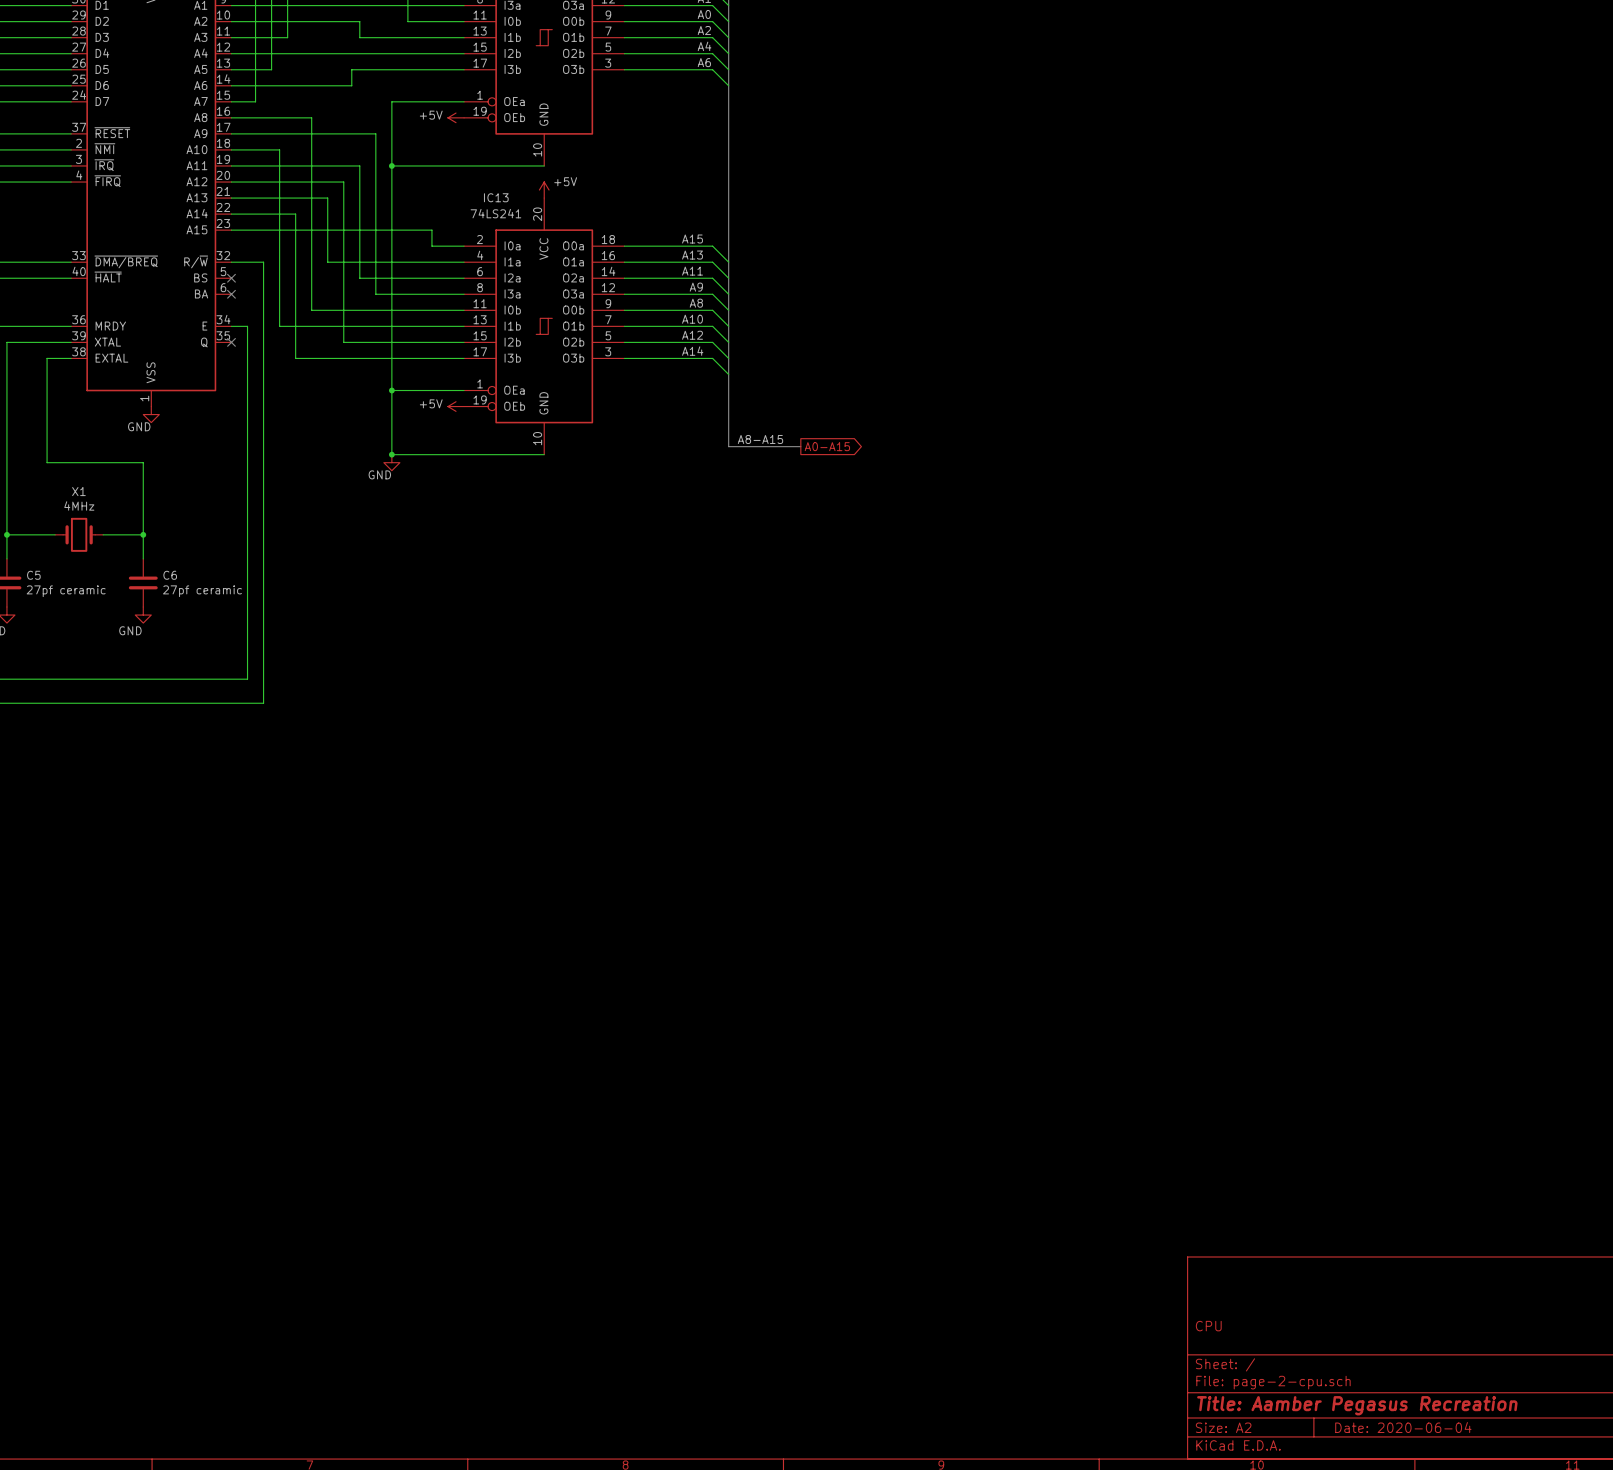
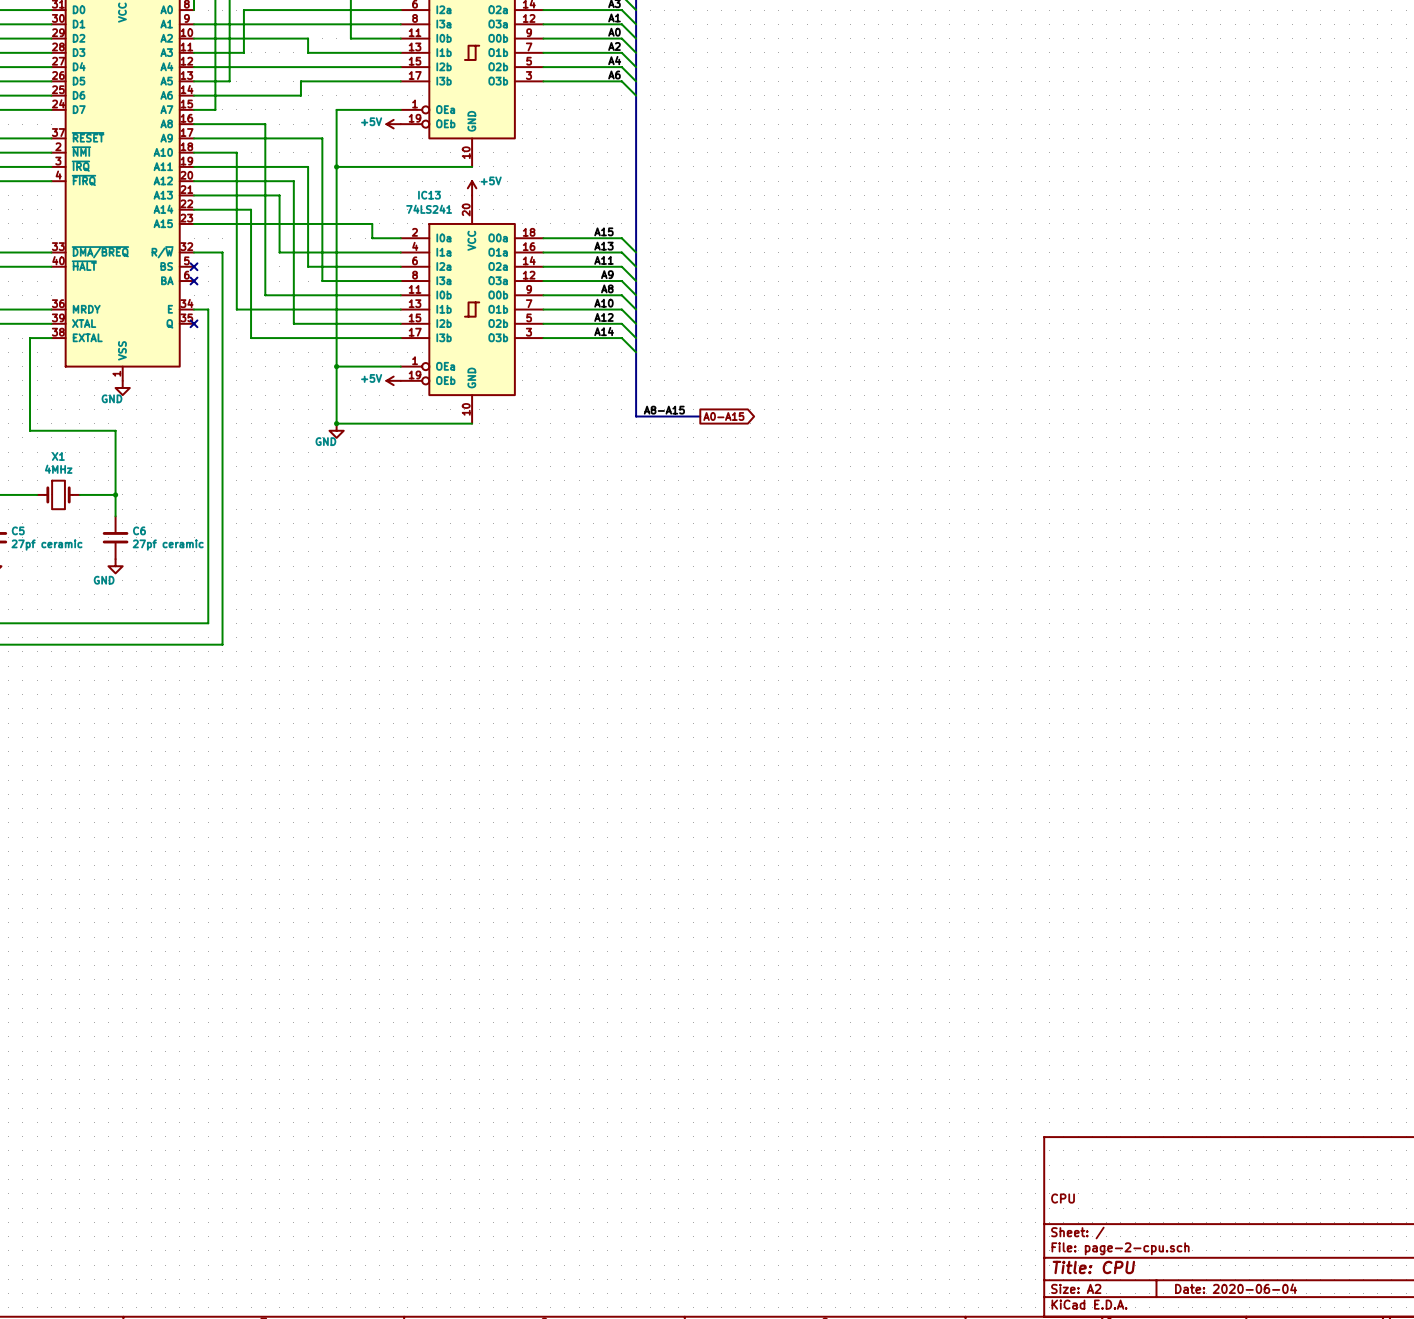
title block: Title: Aamber Pegasus Recreation (1357, 1405) -> Title: CPU (1093, 1267)

